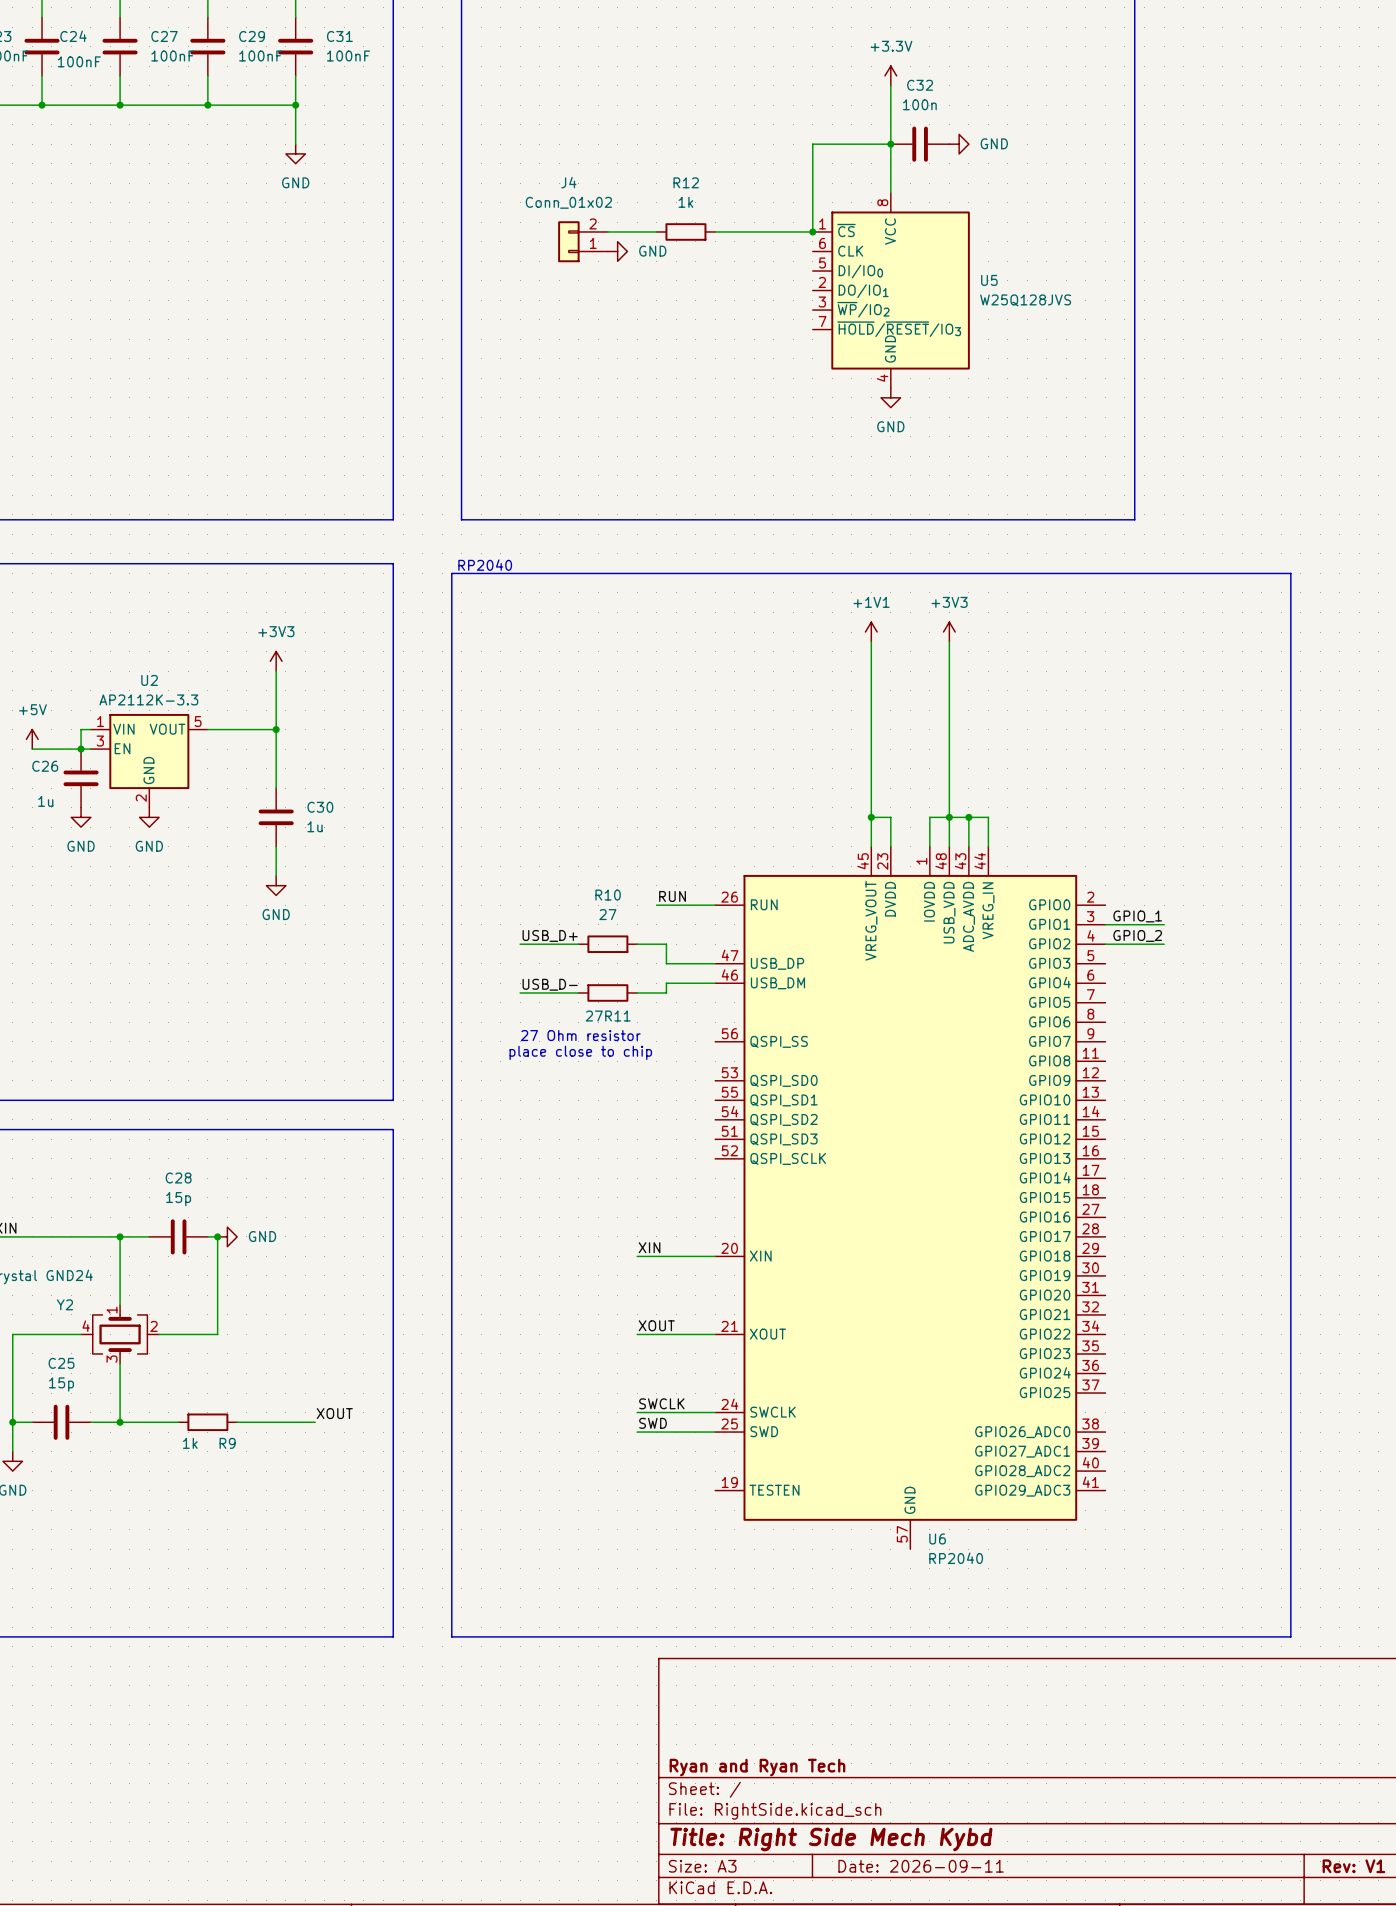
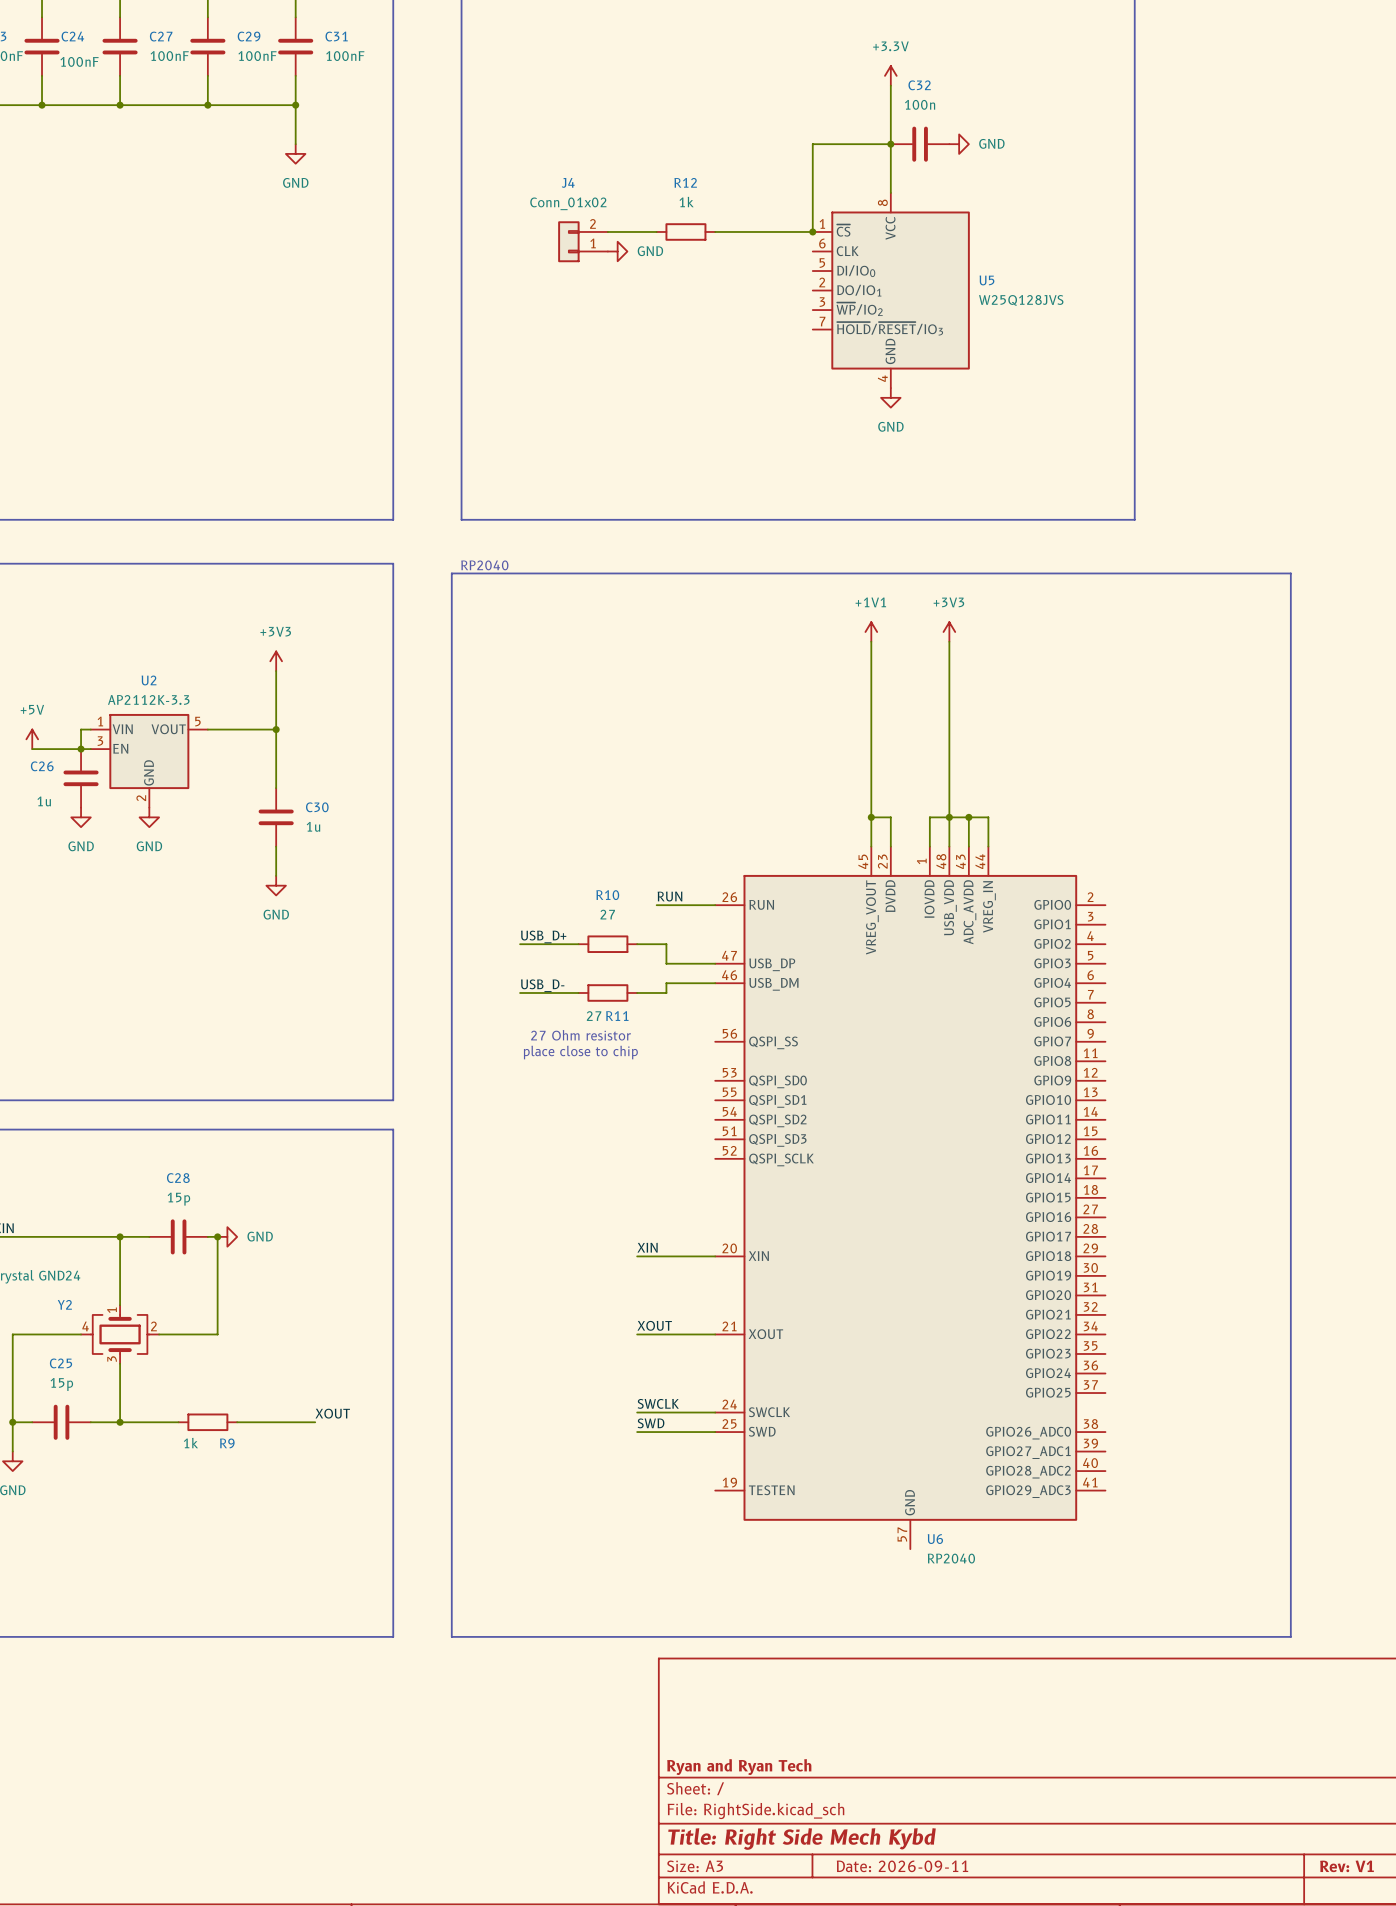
label: GPIO_1 (1137, 916) -> none
wire: (1105, 924) (1164, 924) -> none
label: GPIO_2 (1137, 935) -> none
wire: (1105, 944) (1164, 944) -> none

